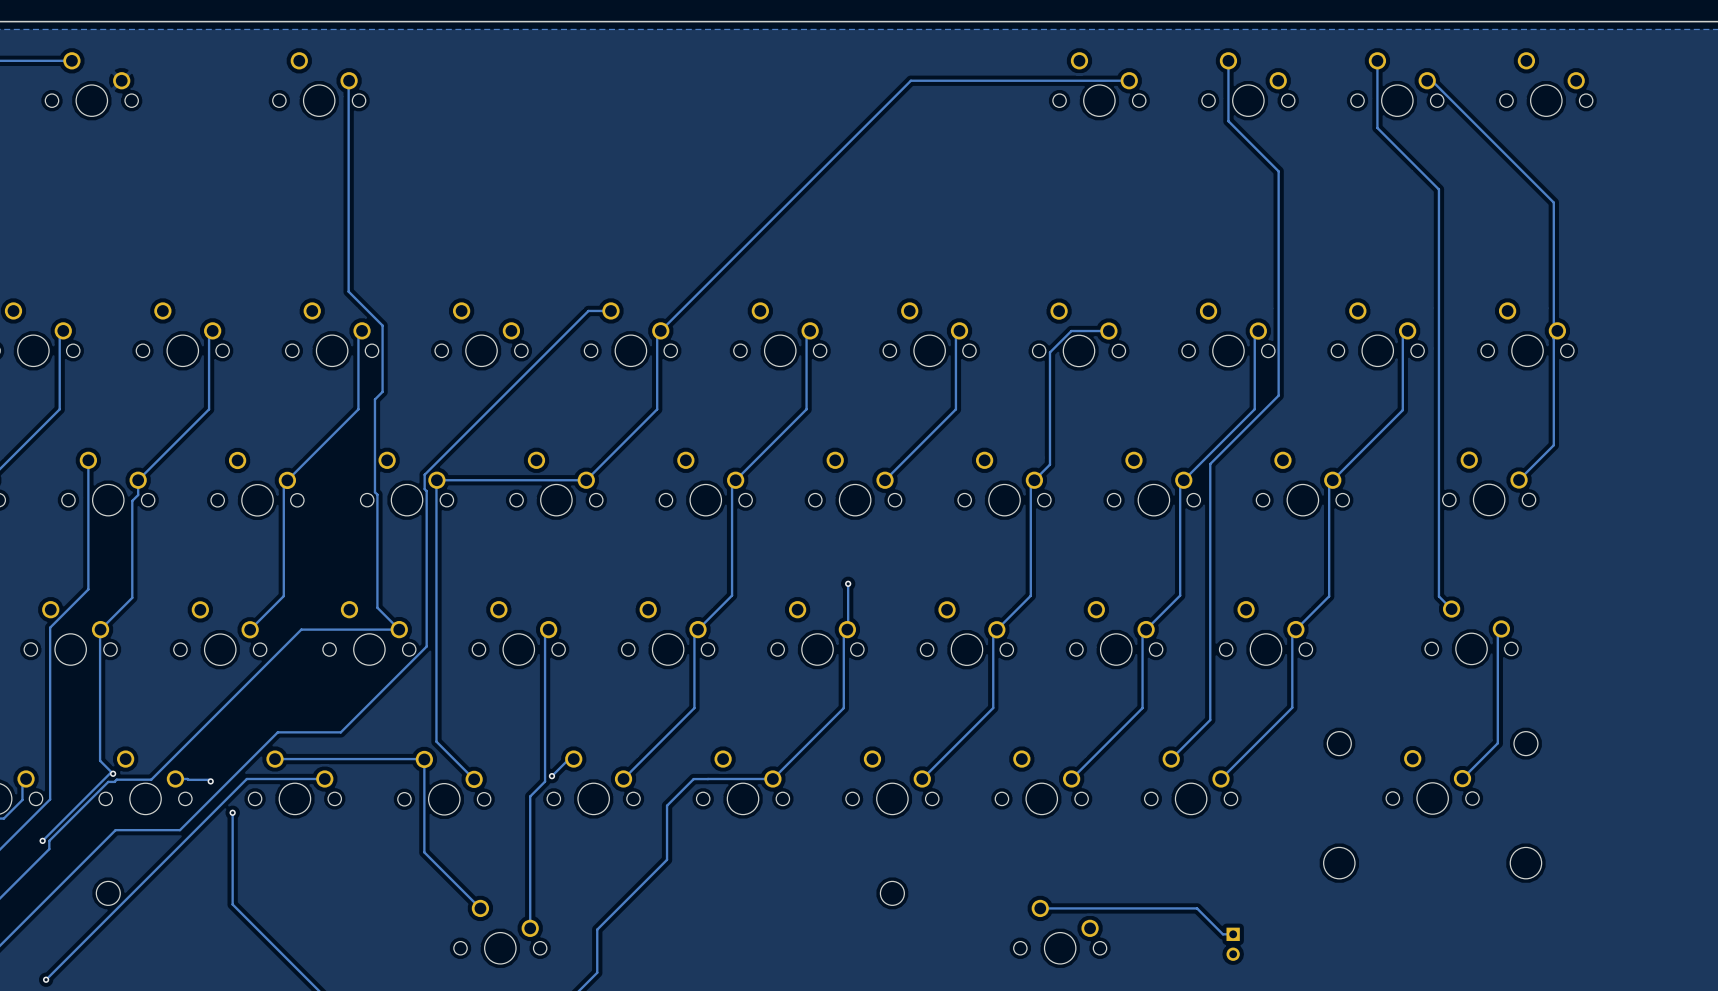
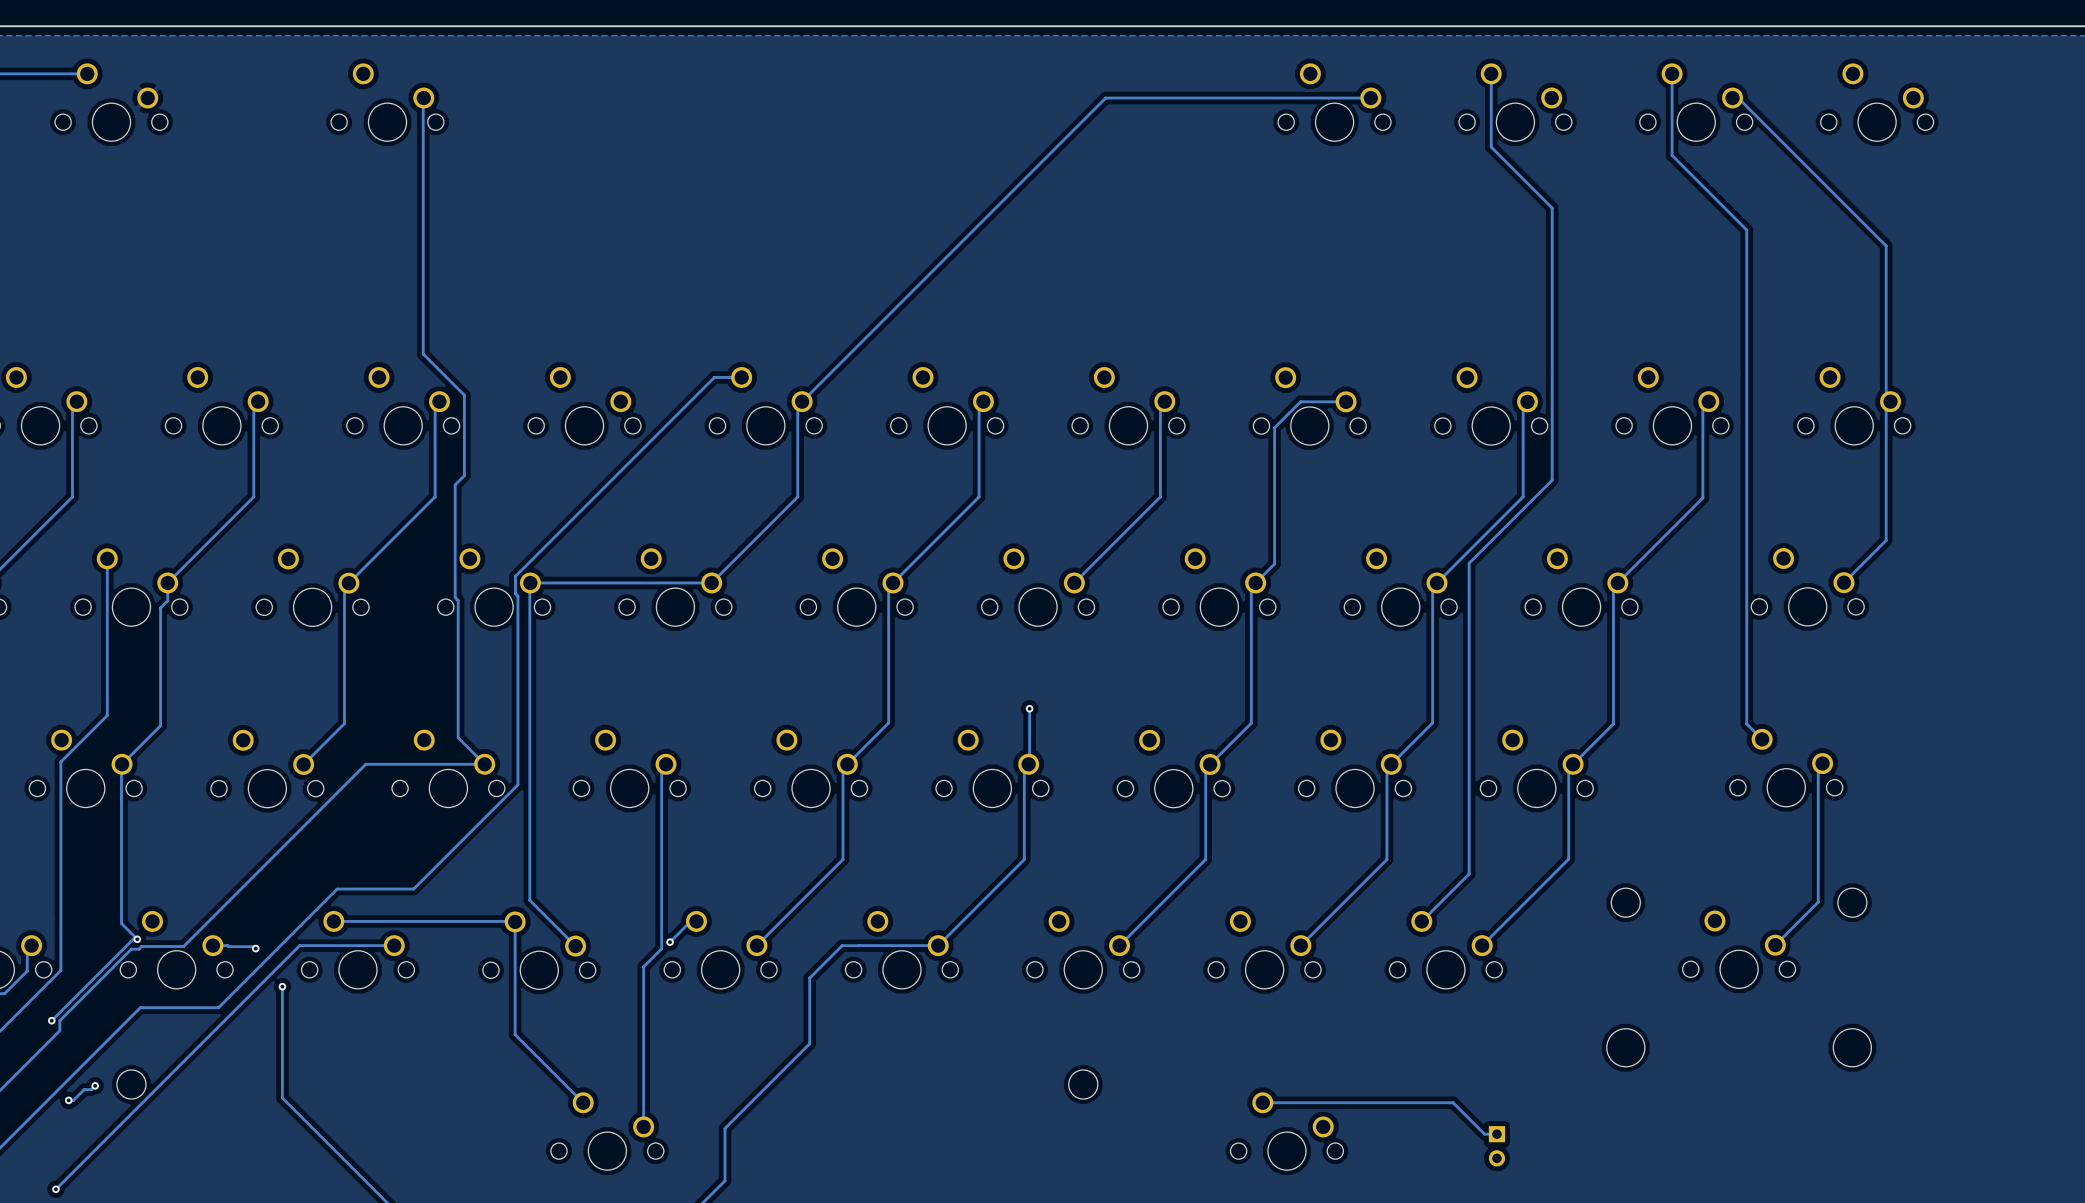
track: none -> (95, 1085) (91, 1089) (84, 1089) (73, 1100) (68, 1100)
via: none -> (95, 1085)
via: none -> (68, 1100)

